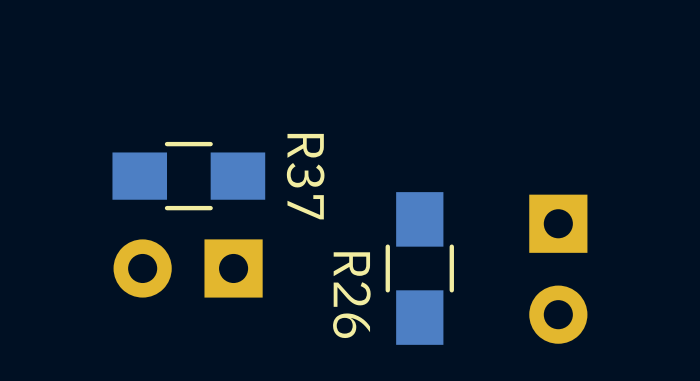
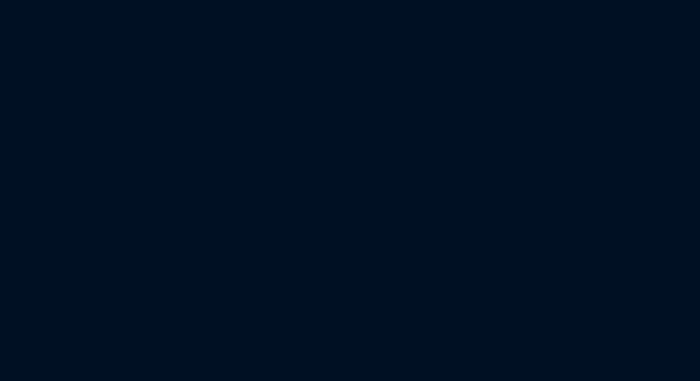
R37: (188, 176) -> none
part: (188, 268) -> none
R26: (419, 268) -> none
part: (558, 269) -> none

